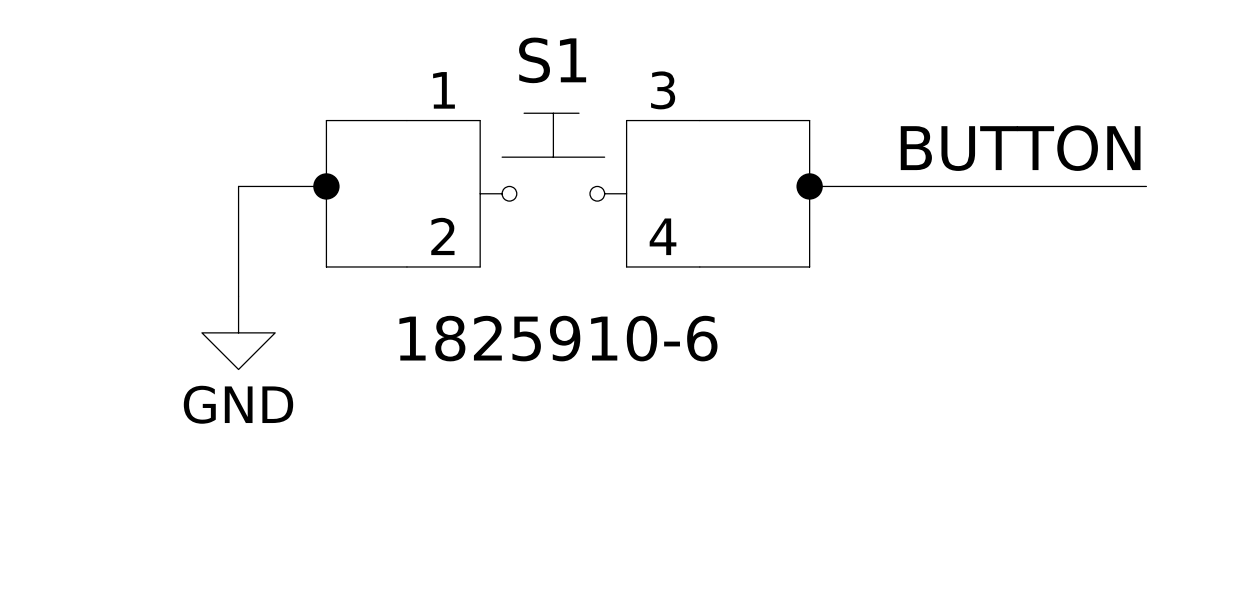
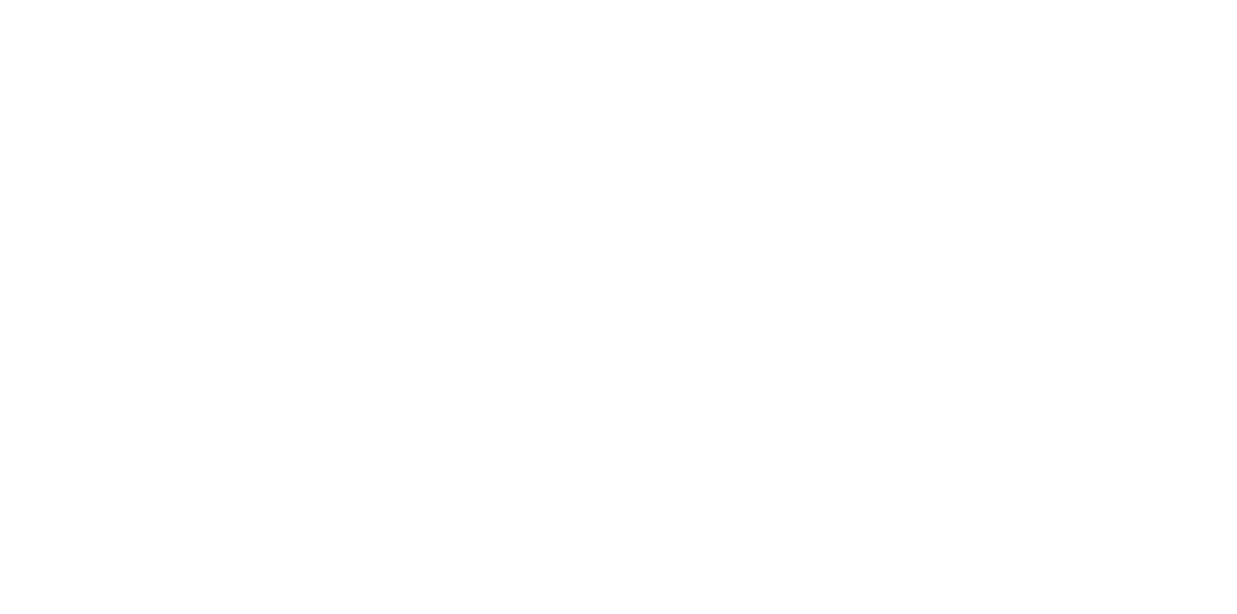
wire: (406, 120) (326, 120) (326, 266) (406, 266) -> none
wire: (699, 120) (809, 120) (809, 266) (699, 266) -> none
label: BUTTON (1020, 148) -> none
wire: (326, 186) (238, 186) (238, 296) -> none
junction: (326, 186) -> none
wire: (809, 186) (1146, 186) -> none
junction: (809, 186) -> none
S1: 1825910-6 (553, 190) -> none
power symbol: GND (238, 332) -> none

